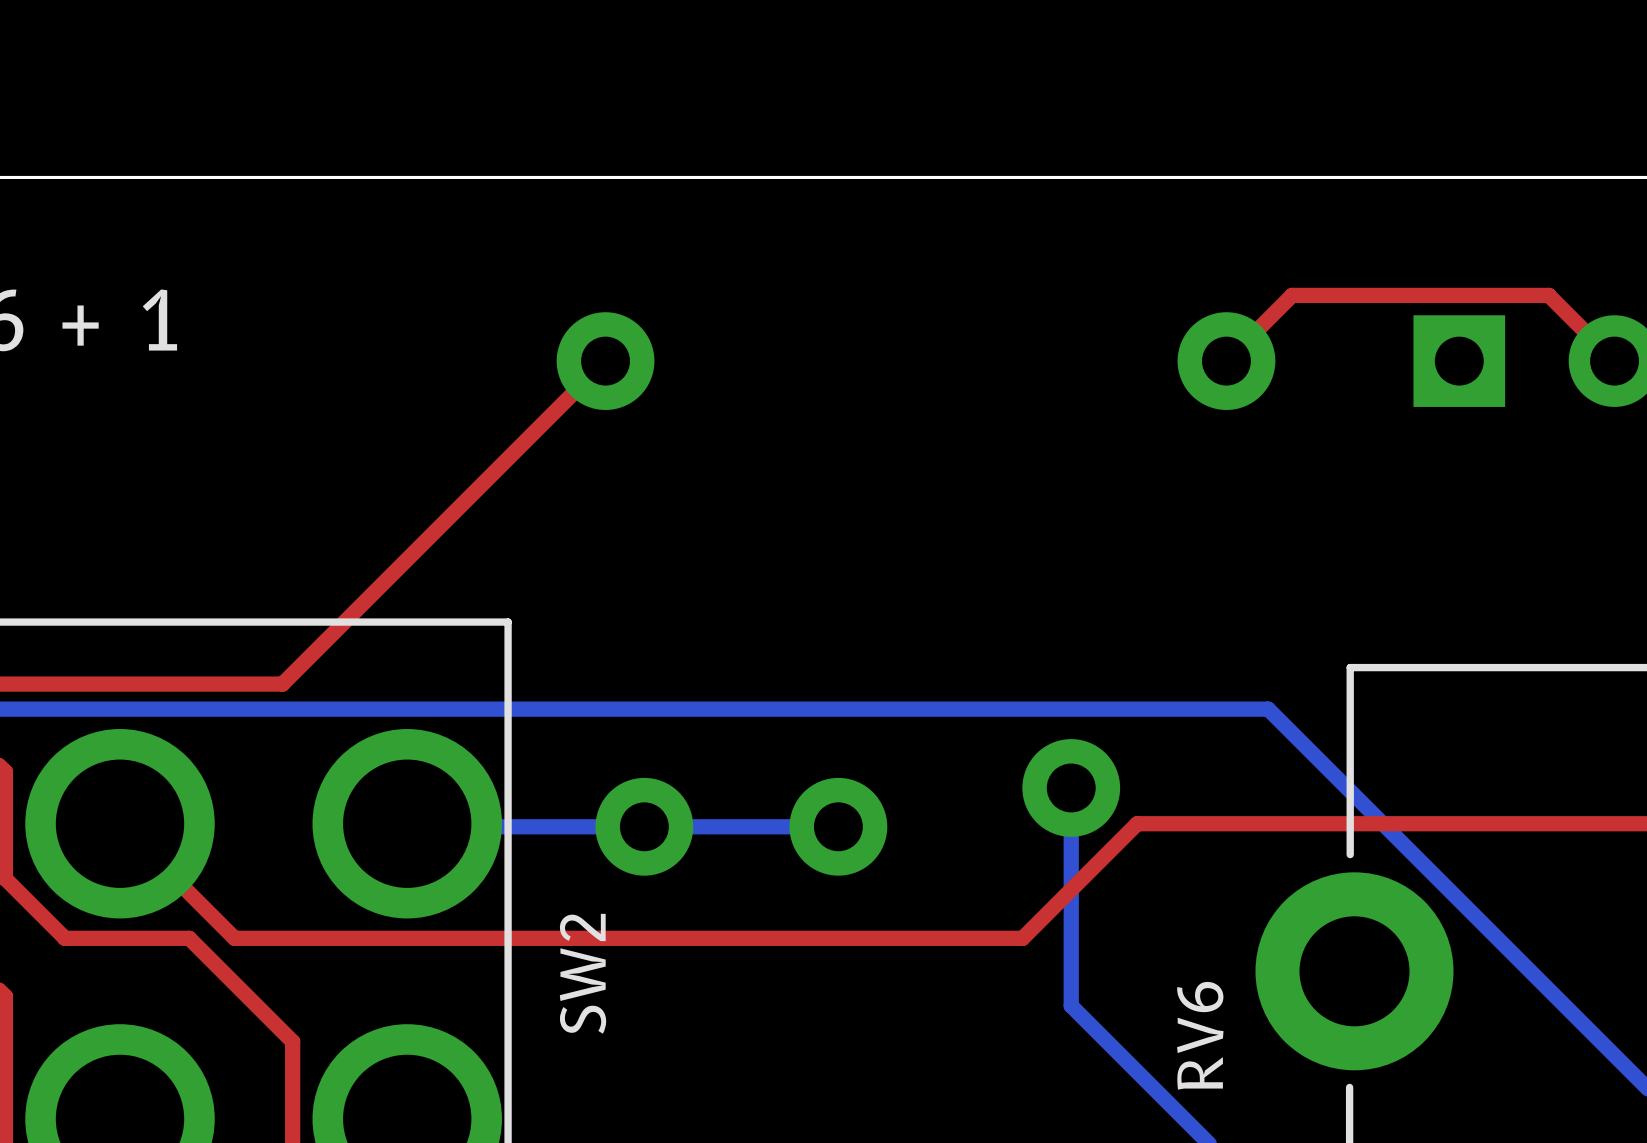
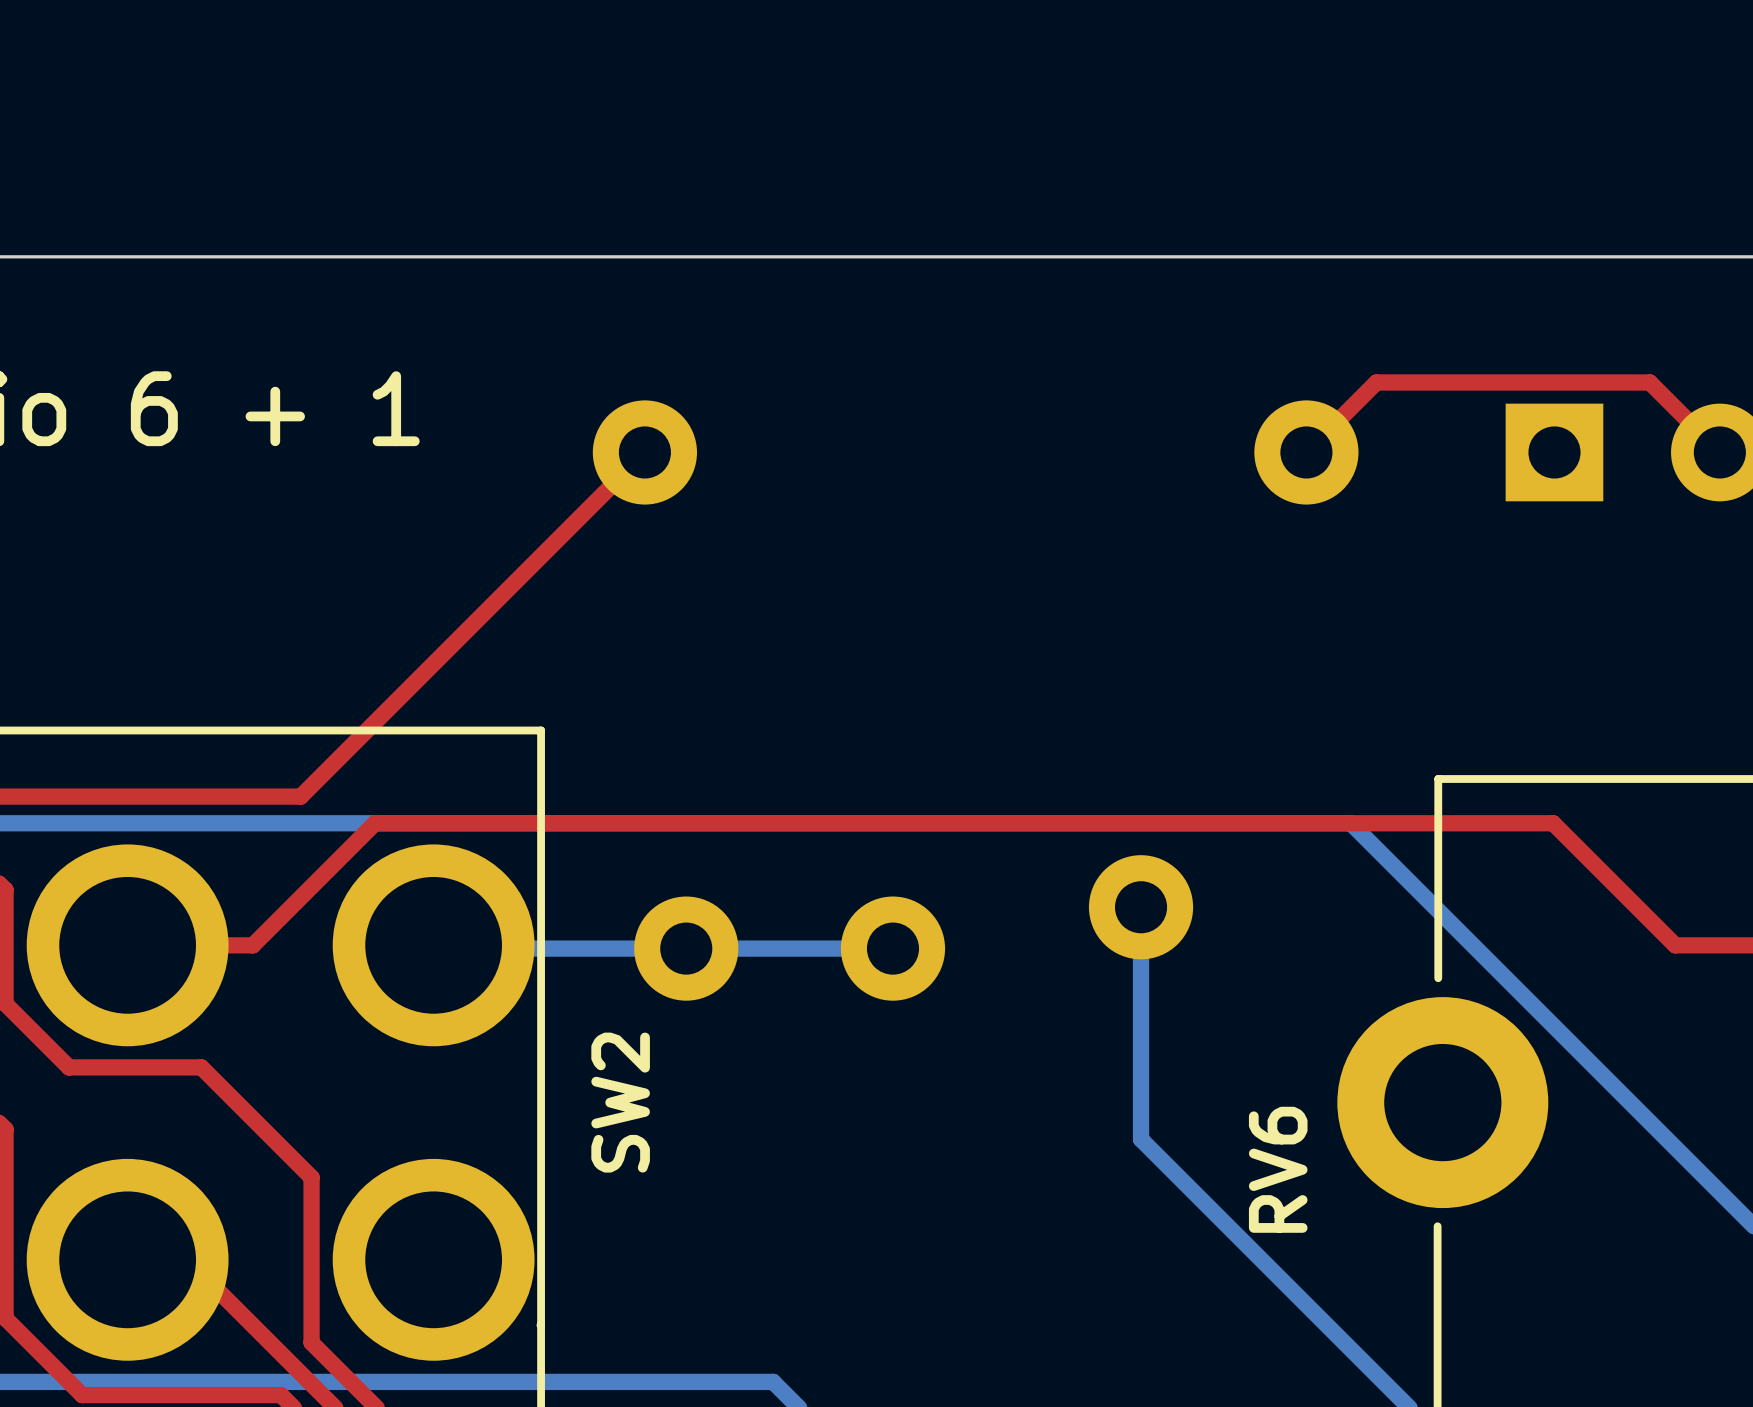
top track: (120, 823) (234, 938) (1022, 938) (1137, 823) (1572, 823) -> (127, 945) (252, 945) (375, 823) (1553, 823) (1675, 945)

